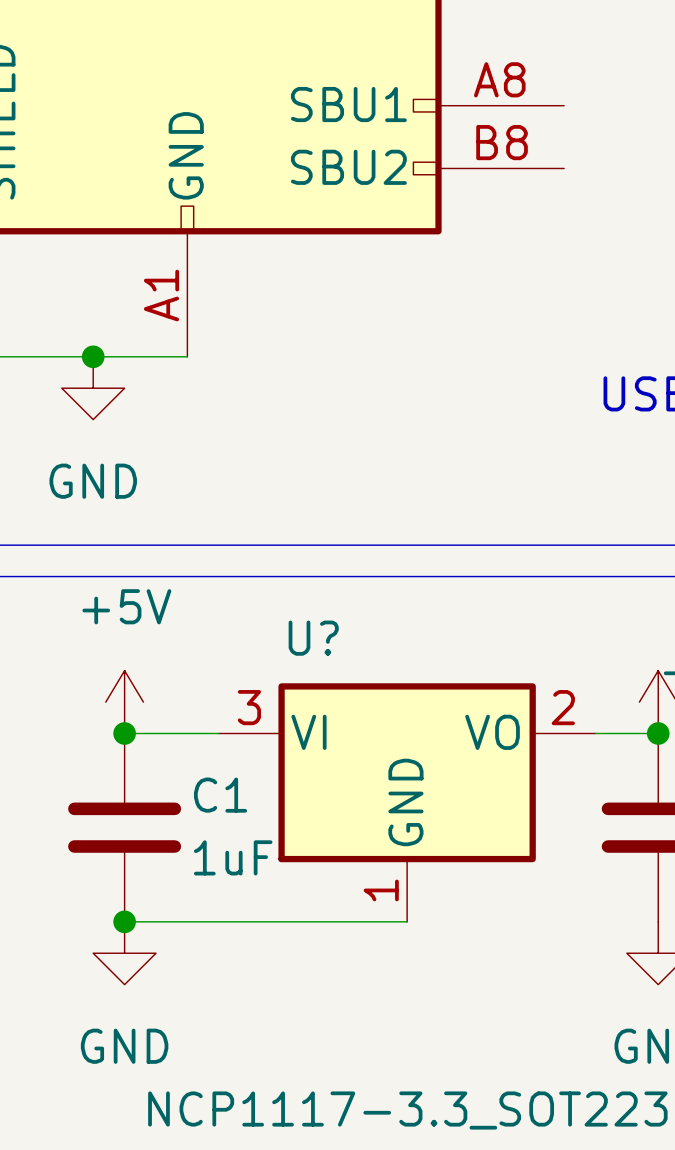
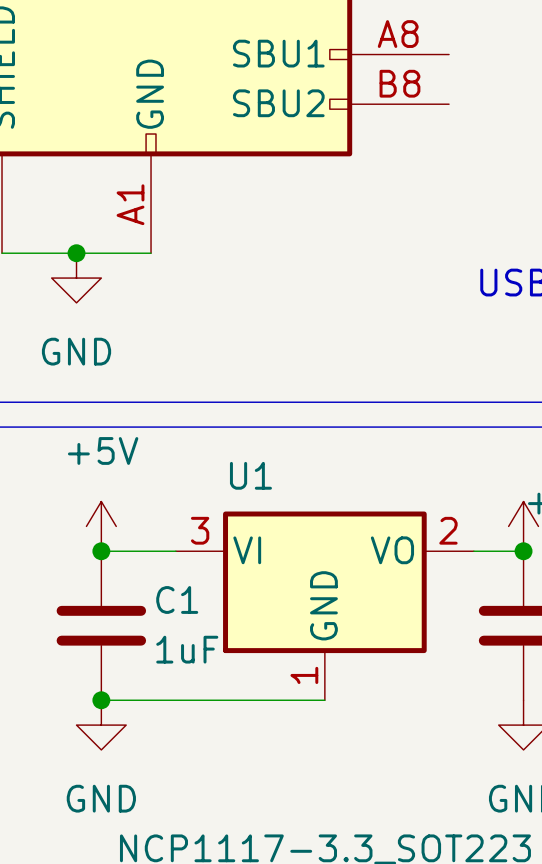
U? name: U? (313, 638) -> U1 (250, 475)

